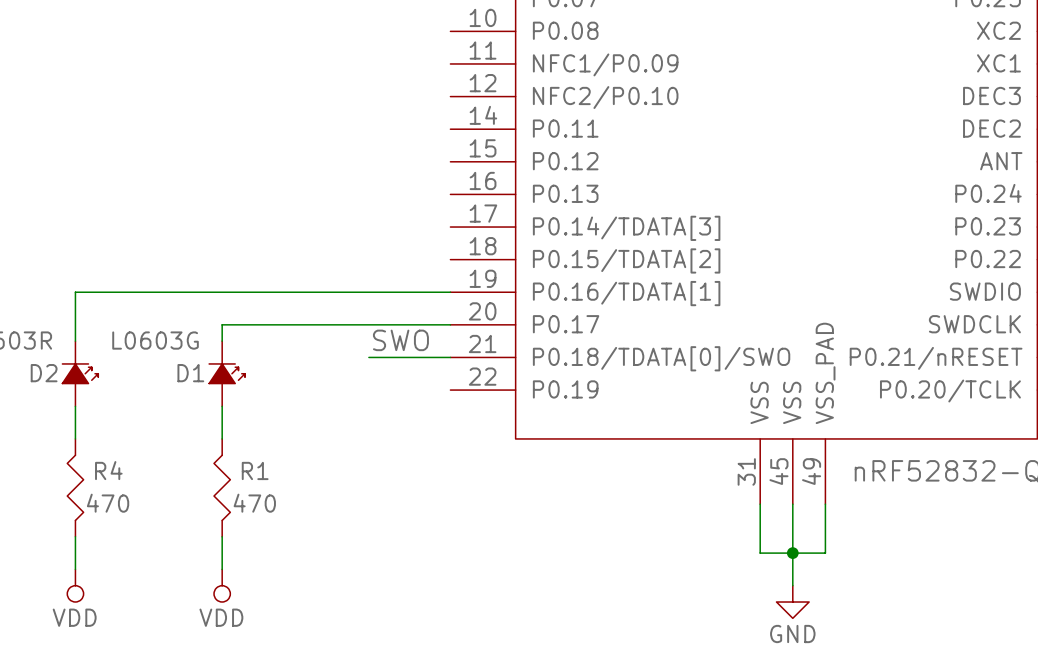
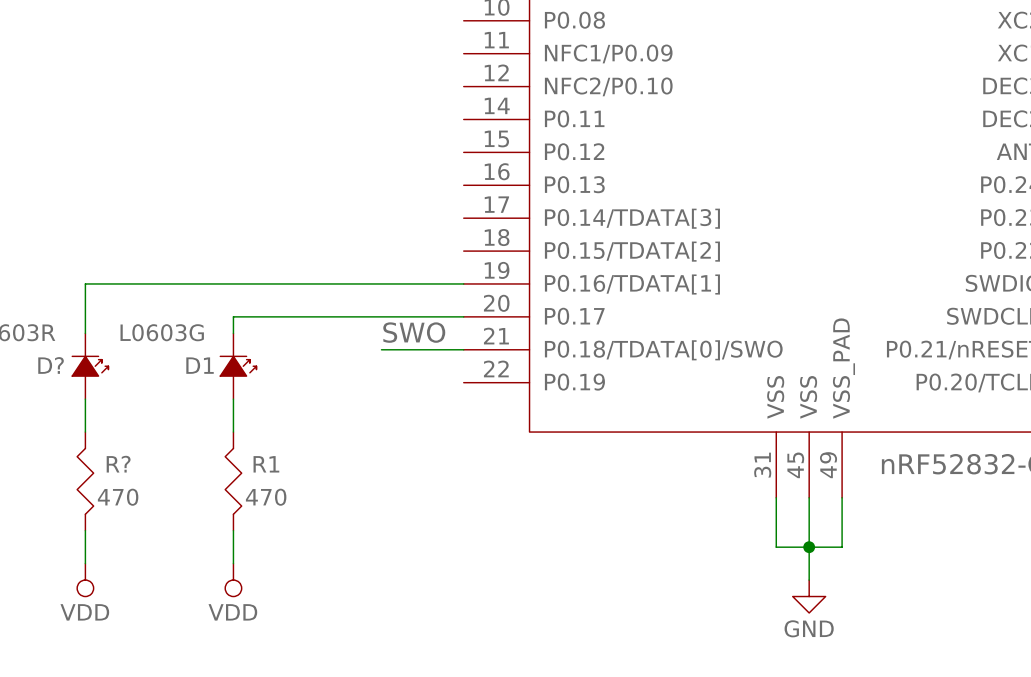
D2 name: D2 (44, 373) -> D? (51, 365)
R4 name: R4 (108, 470) -> R? (118, 464)

